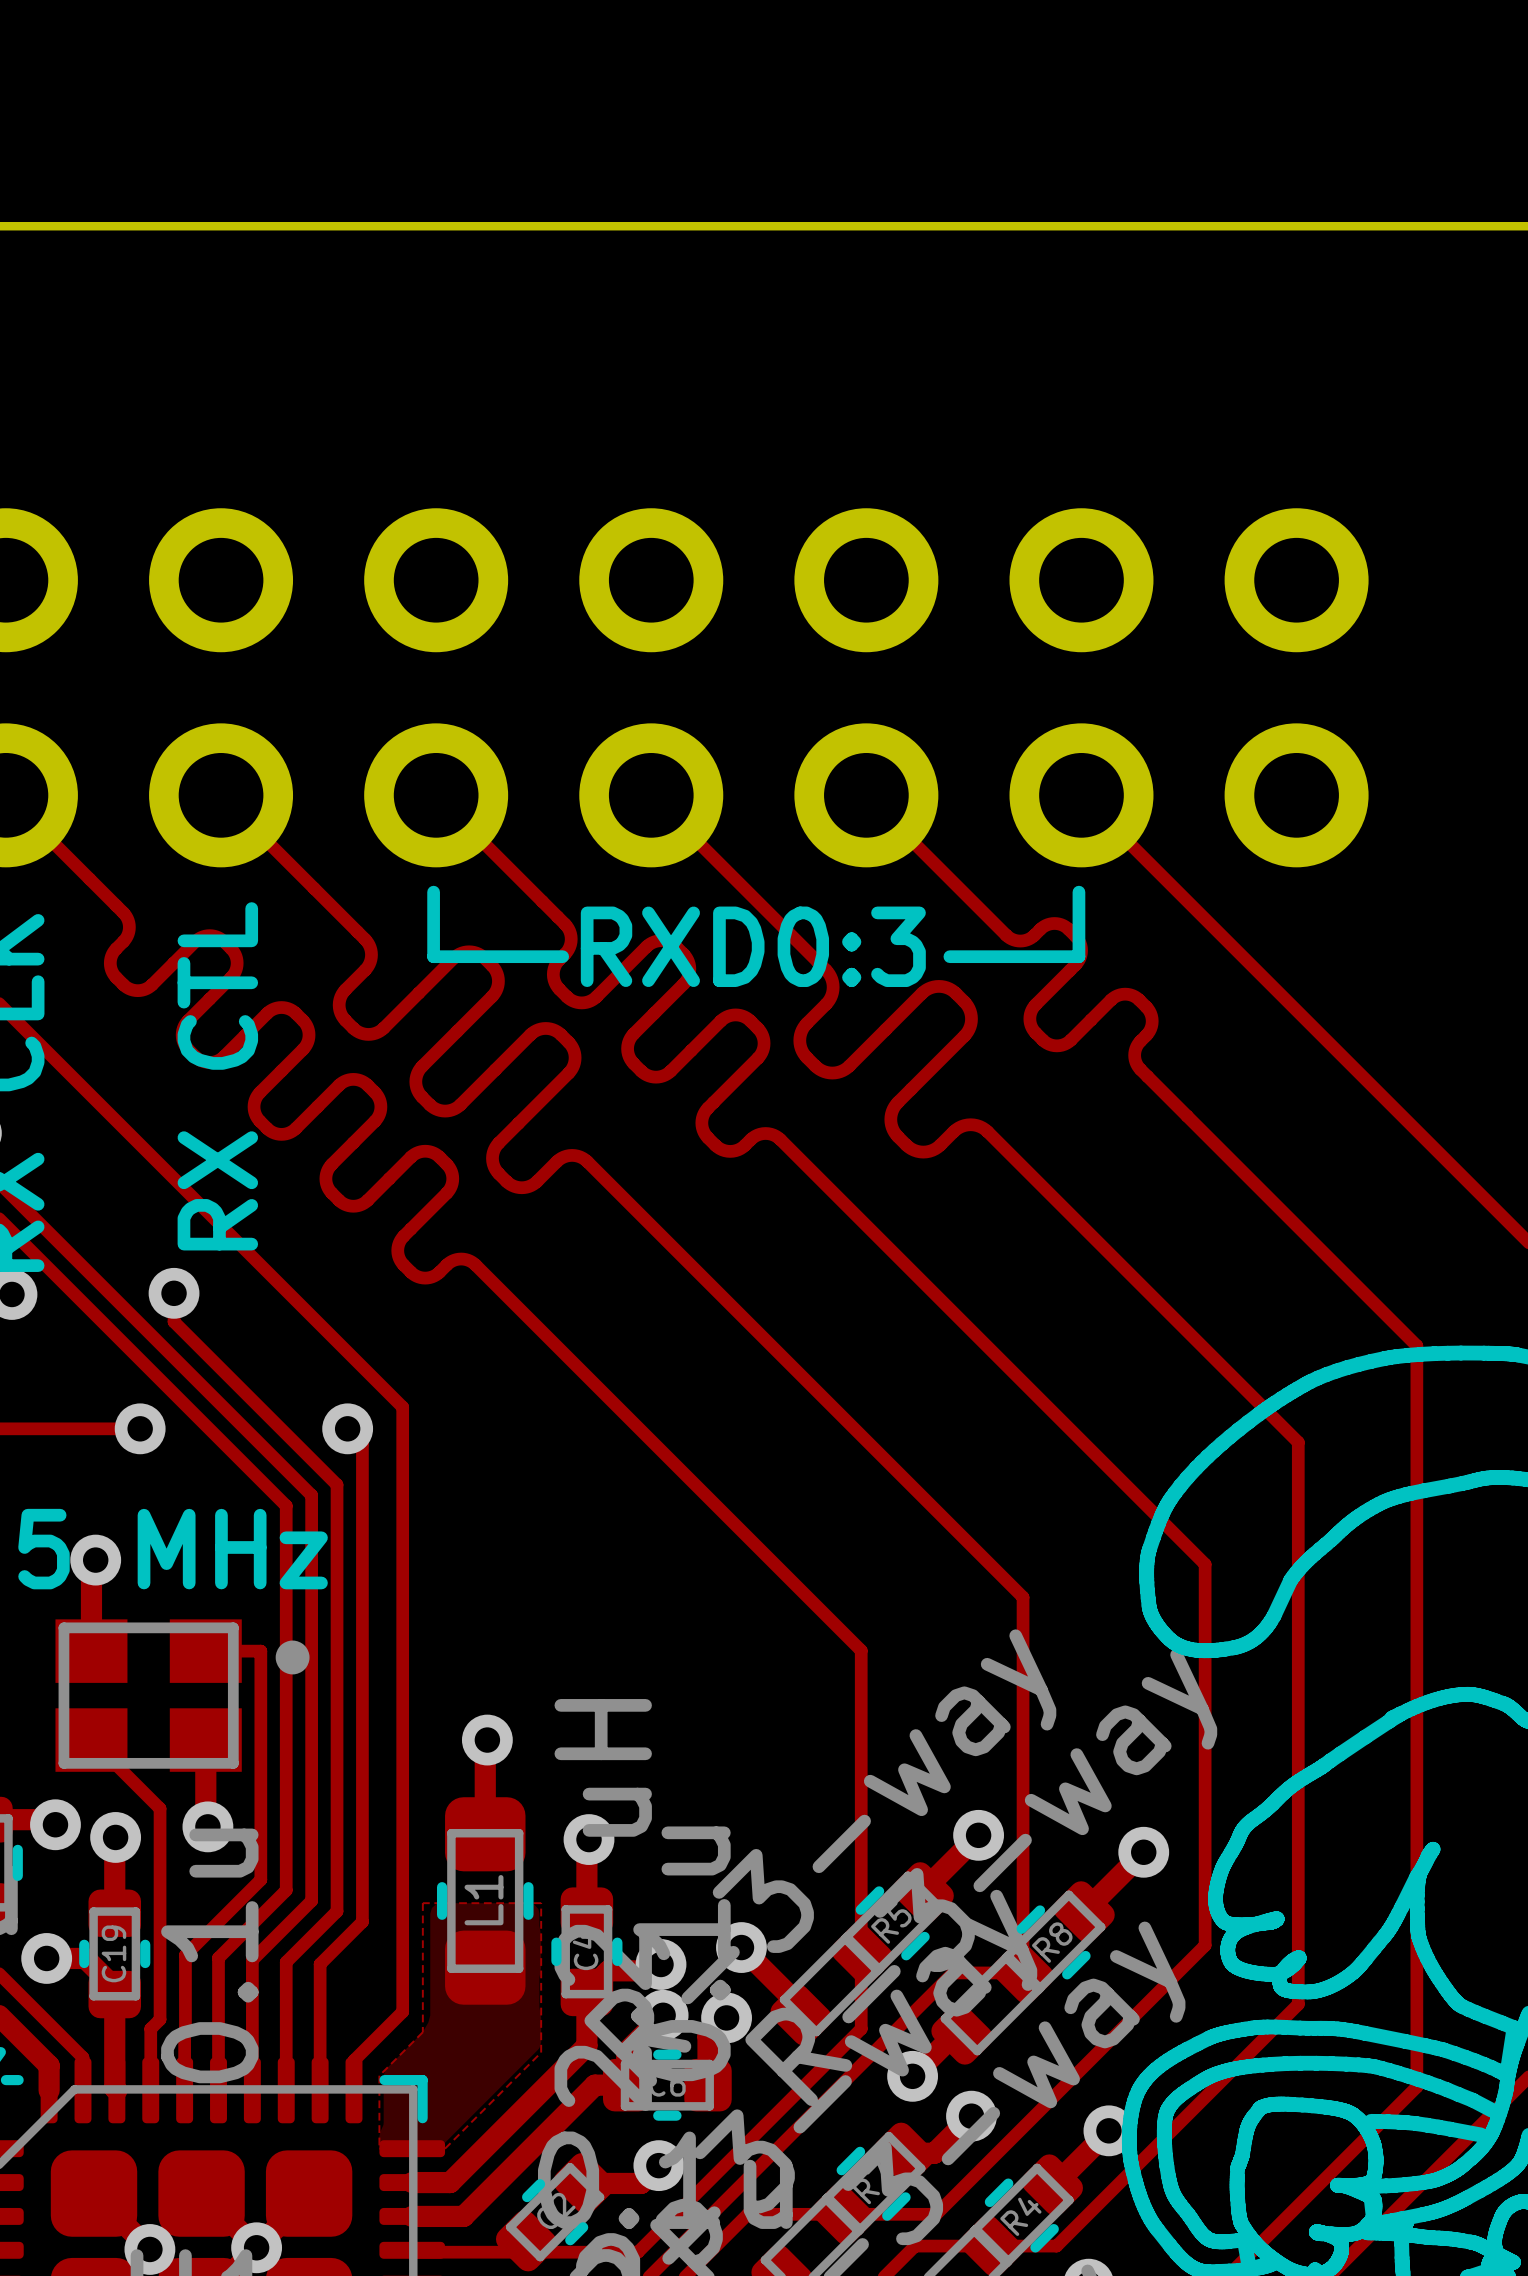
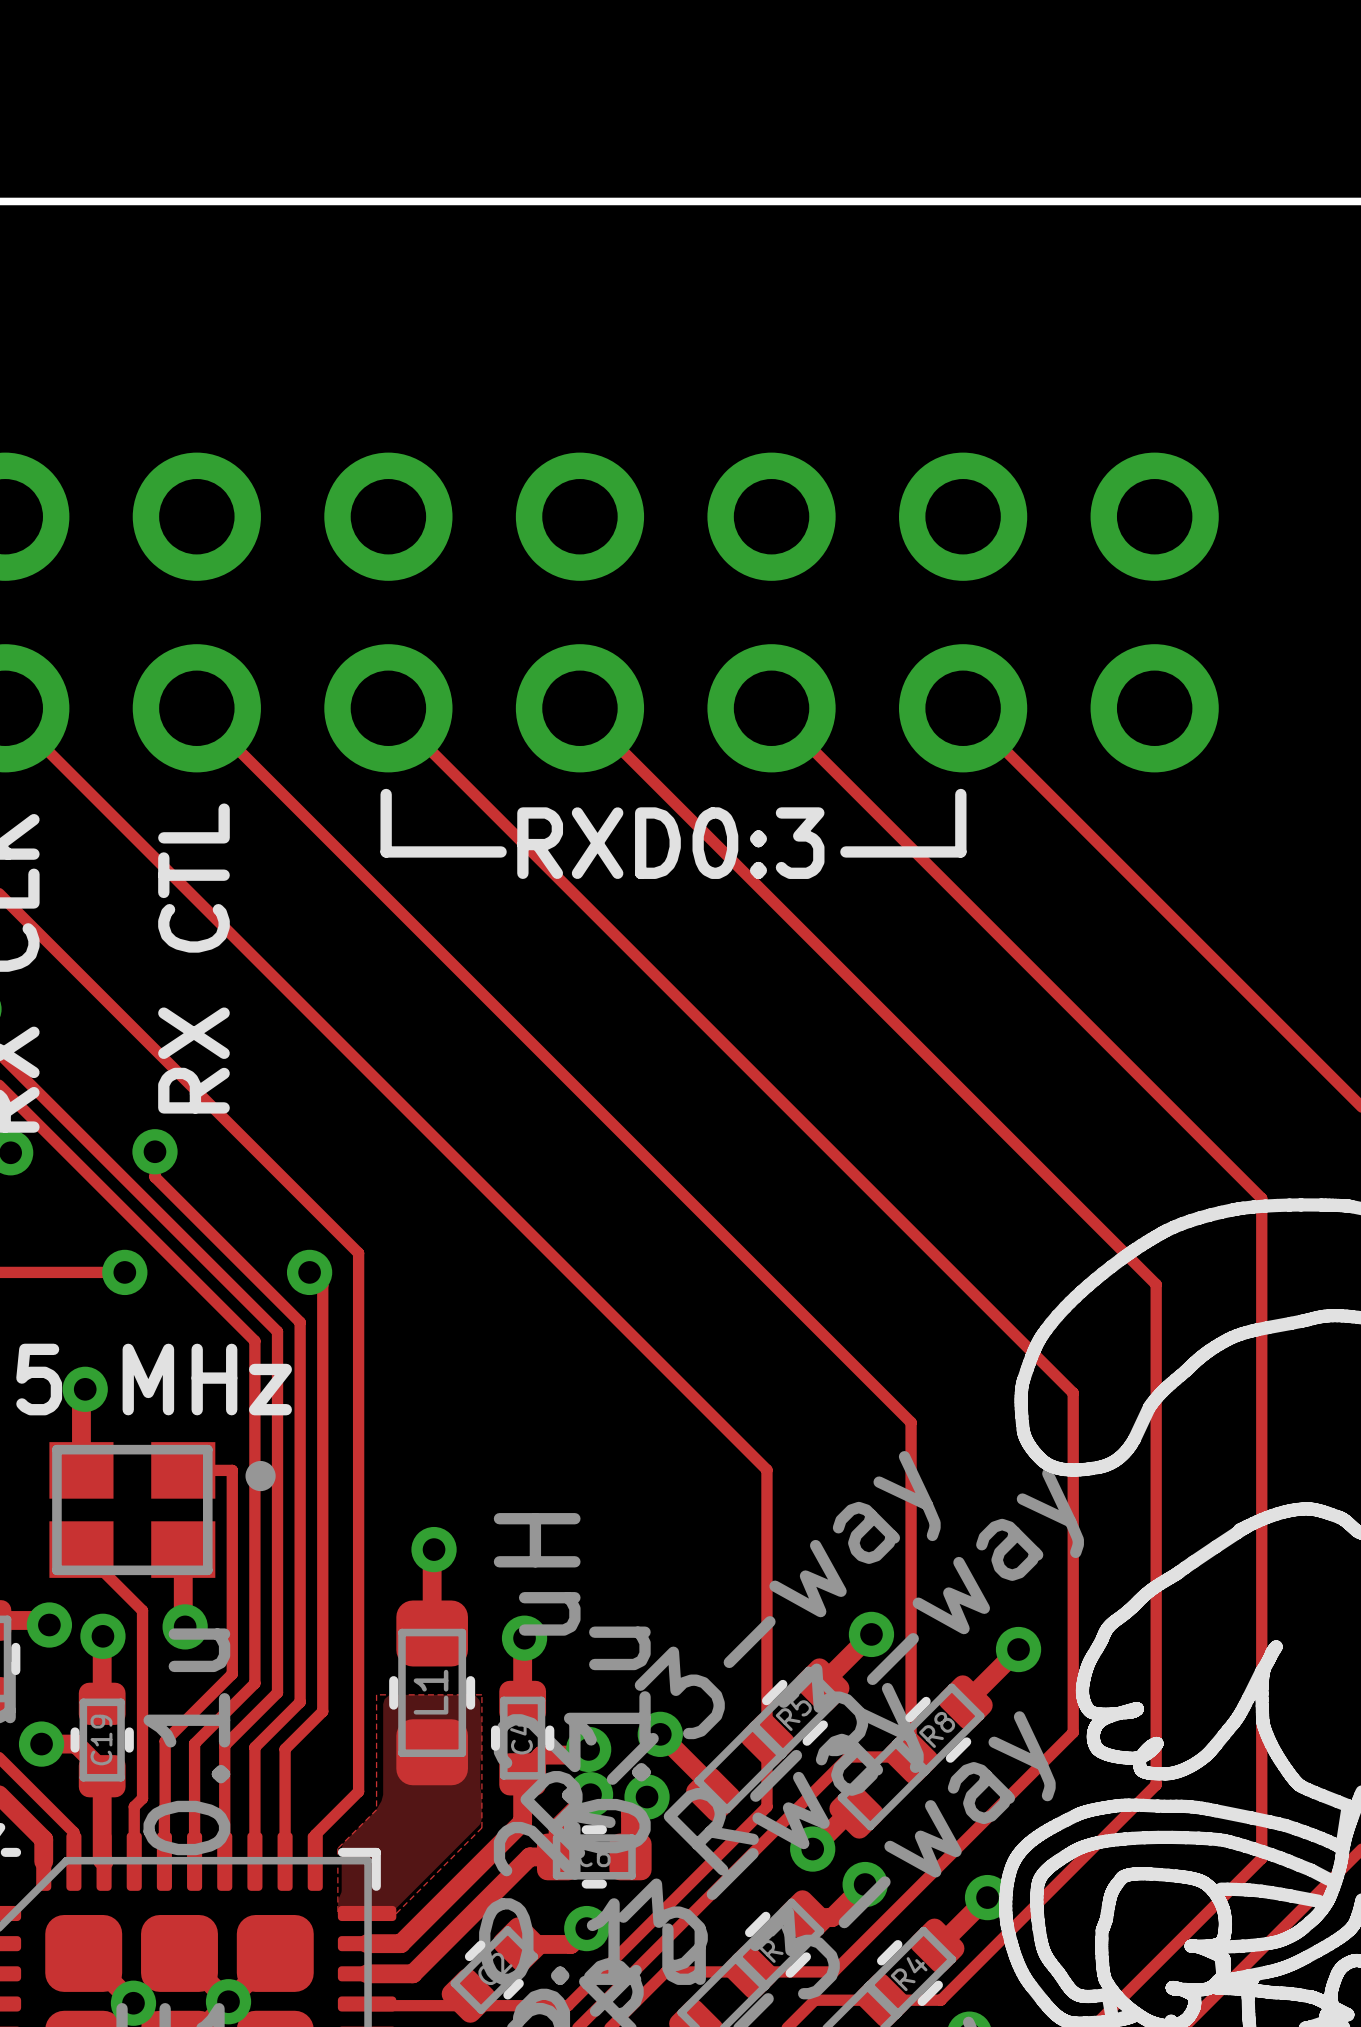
track: (123, 912) (128, 922) (128, 931) (124, 939) (112, 954) (110, 965) (114, 975) (131, 989) (140, 990) (150, 986) (195, 941) (202, 936) (211, 935) (218, 937) (235, 954) (237, 963) (234, 973) (188, 1020) (183, 1028) (182, 1037) (184, 1043) (198, 1059) (209, 1062) (220, 1059) (267, 1013) (274, 1008) (283, 1007) (290, 1009) (305, 1024) (309, 1035) (305, 1045) (259, 1092) (255, 1100) (254, 1109) (256, 1115) (268, 1129) (281, 1134) (292, 1131) (339, 1085) (346, 1080) (355, 1079) (362, 1081) (376, 1094) (380, 1106) (377, 1117) (331, 1164) (327, 1172) (325, 1178) (327, 1187) (340, 1201) (351, 1206) (364, 1203) (410, 1157) (418, 1152) (427, 1151) (434, 1153) (448, 1166) (452, 1178) (449, 1189) (399, 1242) (398, 1255) (403, 1264) (414, 1275) (425, 1278) (436, 1275) (448, 1263) (456, 1259) (467, 1260) (475, 1264) -> (109, 812) (423, 1126)
track: (557, 916) (568, 928) (571, 939) (568, 949) (554, 966) (554, 979) (559, 989) (574, 1001) (586, 1002) (594, 998) (646, 946) (654, 941) (663, 940) (670, 942) (686, 957) (689, 969) (686, 980) (629, 1040) (627, 1048) (629, 1056) (644, 1073) (656, 1077) (667, 1073) (720, 1021) (728, 1016) (738, 1015) (744, 1017) (757, 1028) (763, 1040) (760, 1054) (706, 1109) (702, 1118) (702, 1127) (706, 1136) (715, 1145) (727, 1151) (740, 1148) (760, 1134) (771, 1134) (780, 1139) -> (496, 816) (695, 1014)
track: (1006, 935) (1013, 939) (1024, 940) (1032, 936) (1045, 925) (1056, 923) (1068, 929) (1077, 938) (1080, 945) (1081, 953) (1077, 962) (1031, 1010) (1030, 1023) (1035, 1032) (1049, 1044) (1056, 1045) (1064, 1044) (1113, 998) (1122, 994) (1132, 995) (1148, 1009) (1152, 1018) (1149, 1031) (1139, 1042) (1135, 1050) (1135, 1059) (1140, 1069) -> (896, 832) (1015, 952)
track: (365, 939) (370, 947) (370, 959) (366, 968) (340, 996) (339, 1010) (345, 1020) (361, 1033) (368, 1034) (377, 1032) (455, 956) (466, 951) (480, 955) (496, 971) (498, 981) (496, 990) (420, 1068) (416, 1078) (418, 1092) (435, 1108) (445, 1111) (454, 1108) (532, 1033) (540, 1028) (552, 1029) (561, 1034) (572, 1048) (575, 1057) (572, 1067) (496, 1145) (493, 1152) (493, 1164) (496, 1171) (508, 1183) (521, 1187) (535, 1183) (563, 1157) (574, 1155) (587, 1161) -> (325, 836) (523, 1034)
track: (826, 970) (832, 981) (831, 995) (827, 1002) (803, 1027) (799, 1040) (805, 1055) (817, 1067) (826, 1072) (837, 1072) (847, 1067) (928, 988) (938, 986) (946, 987) (964, 1001) (971, 1016) (967, 1031) (896, 1104) (891, 1114) (891, 1124) (896, 1134) (906, 1145) (920, 1151) (935, 1148) (956, 1129) (964, 1125) (976, 1125) (987, 1131) -> (735, 864) (879, 1007)

